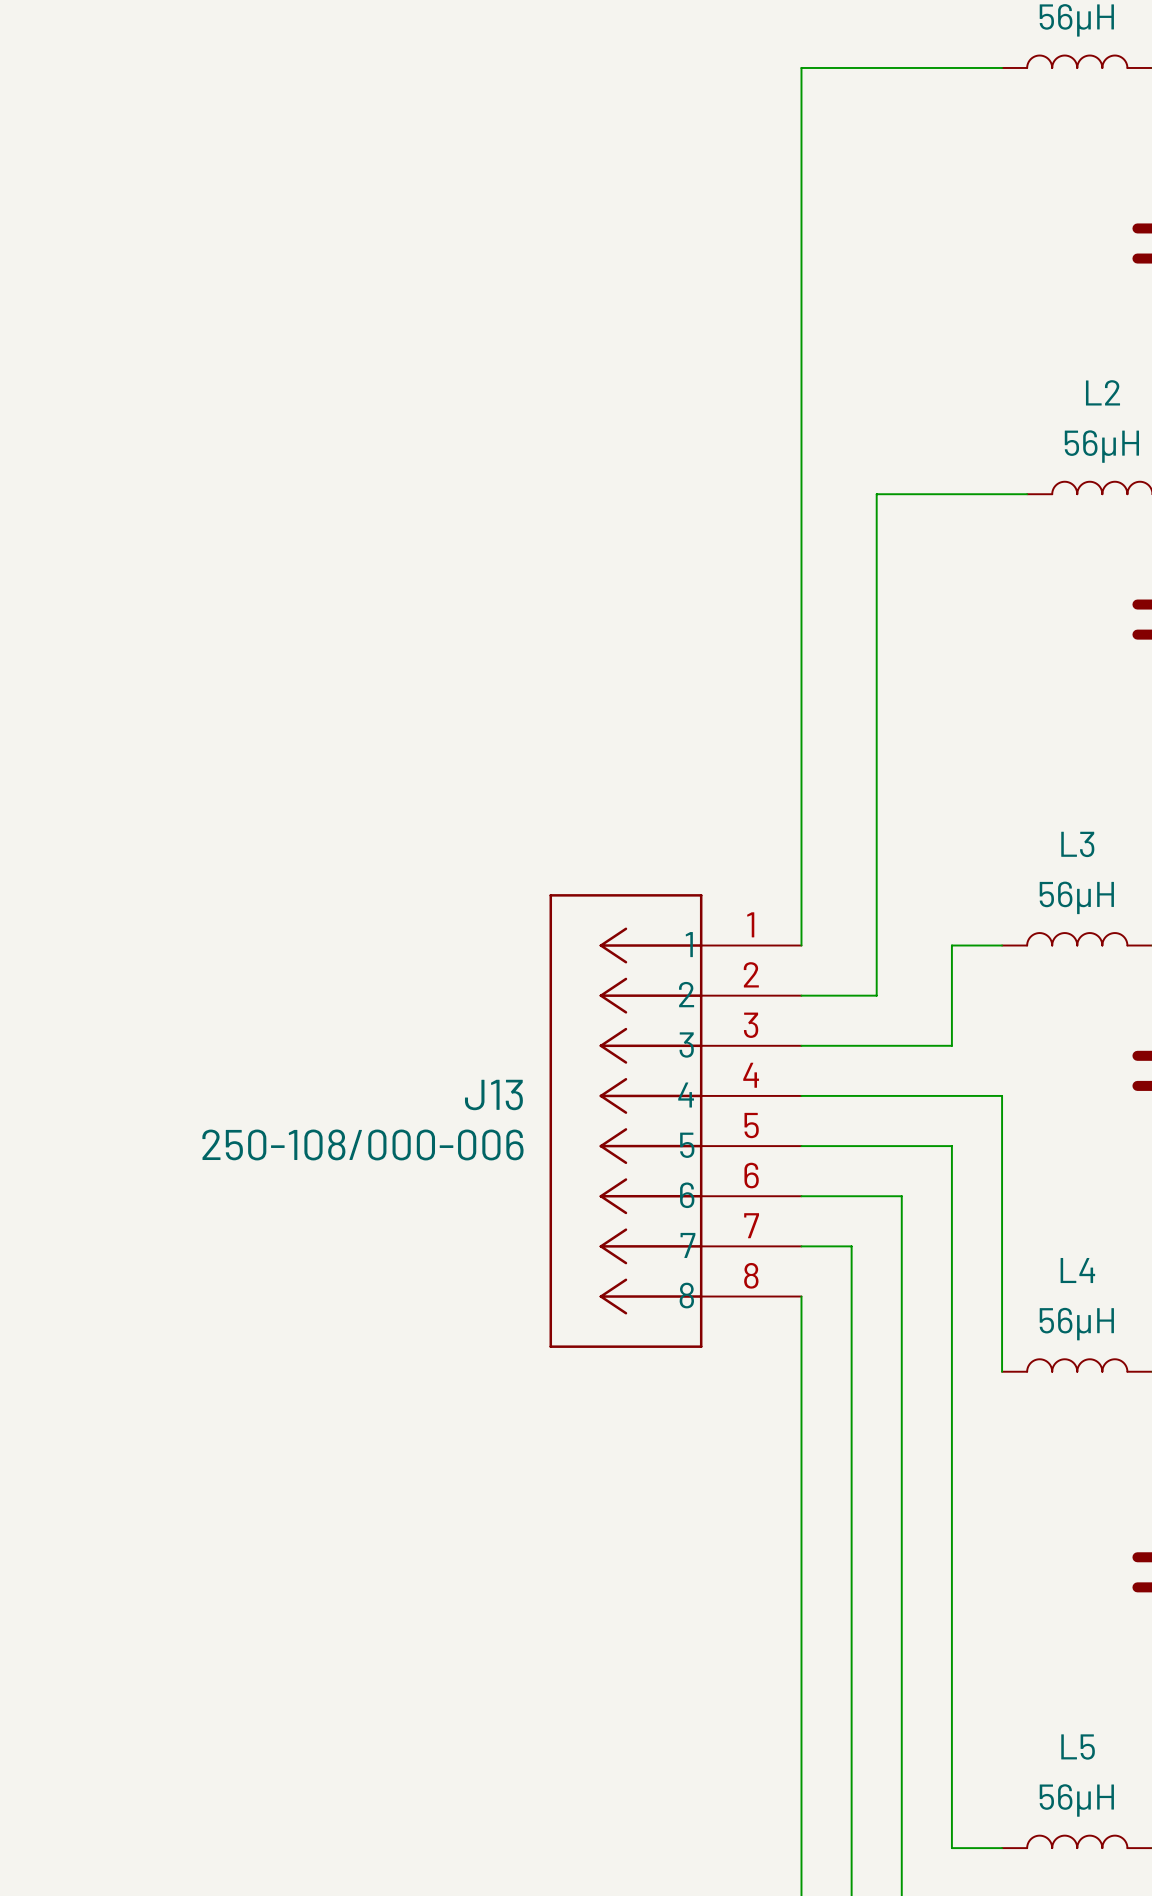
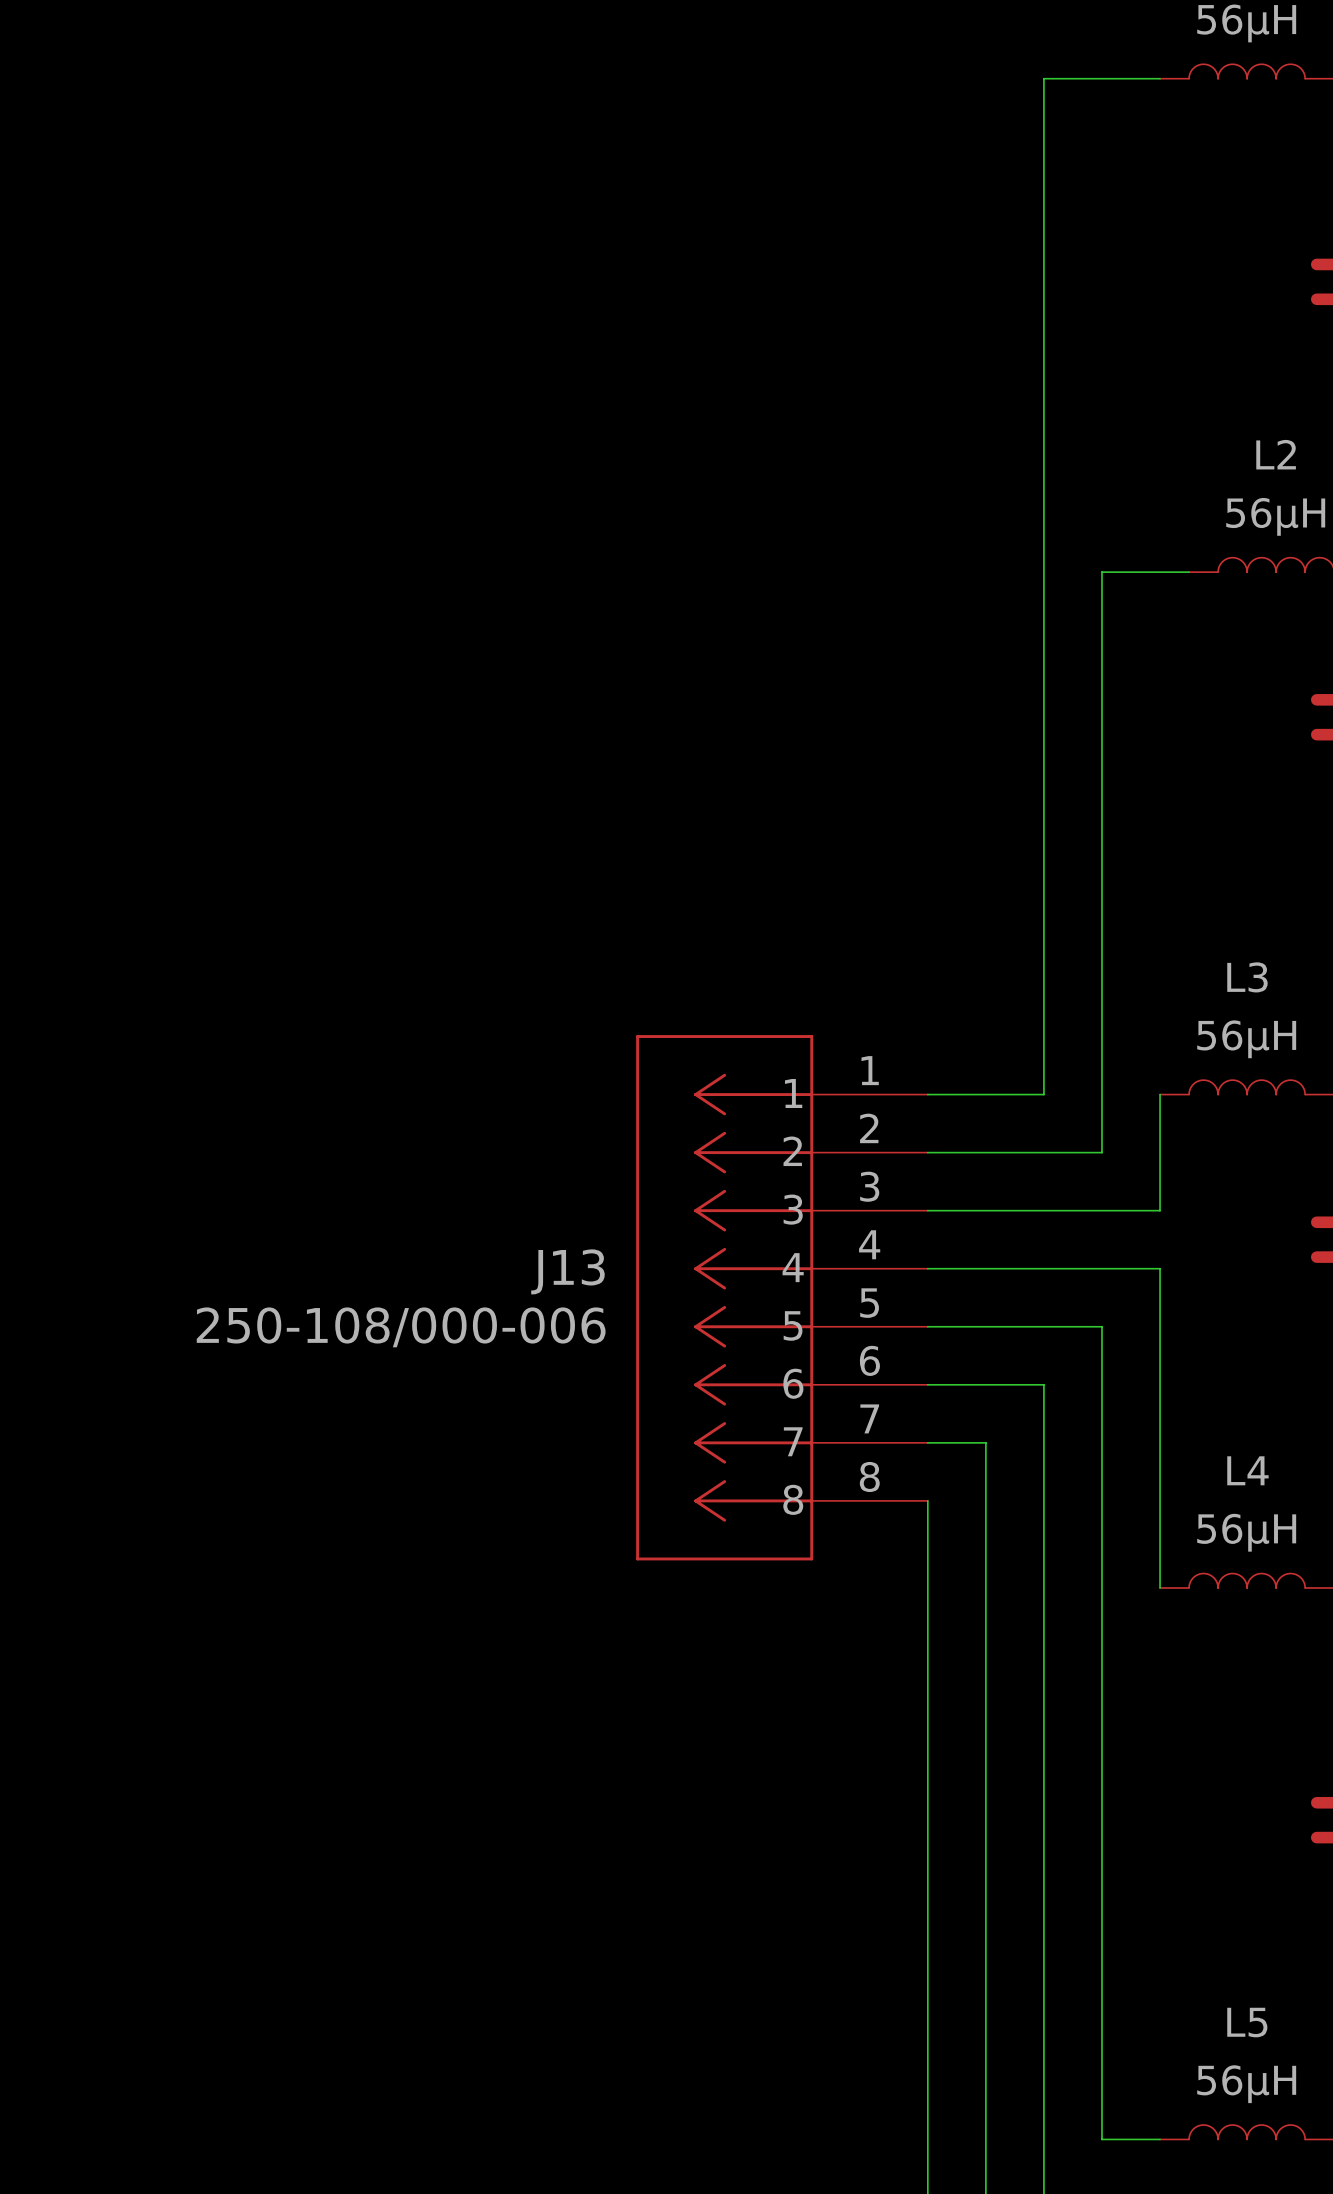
wire: (901, 67) (801, 67) (801, 945) -> (1043, 78) (1043, 1094) (927, 1094)
wire: (951, 494) (876, 494) (876, 995) -> (1101, 572) (1101, 1094)
wire: (951, 945) (1002, 945) -> none
wire: none -> (1014, 1152) (1101, 1152)
wire: (951, 995) (951, 1045) -> (1160, 1094) (1160, 1210) (1101, 1210)

